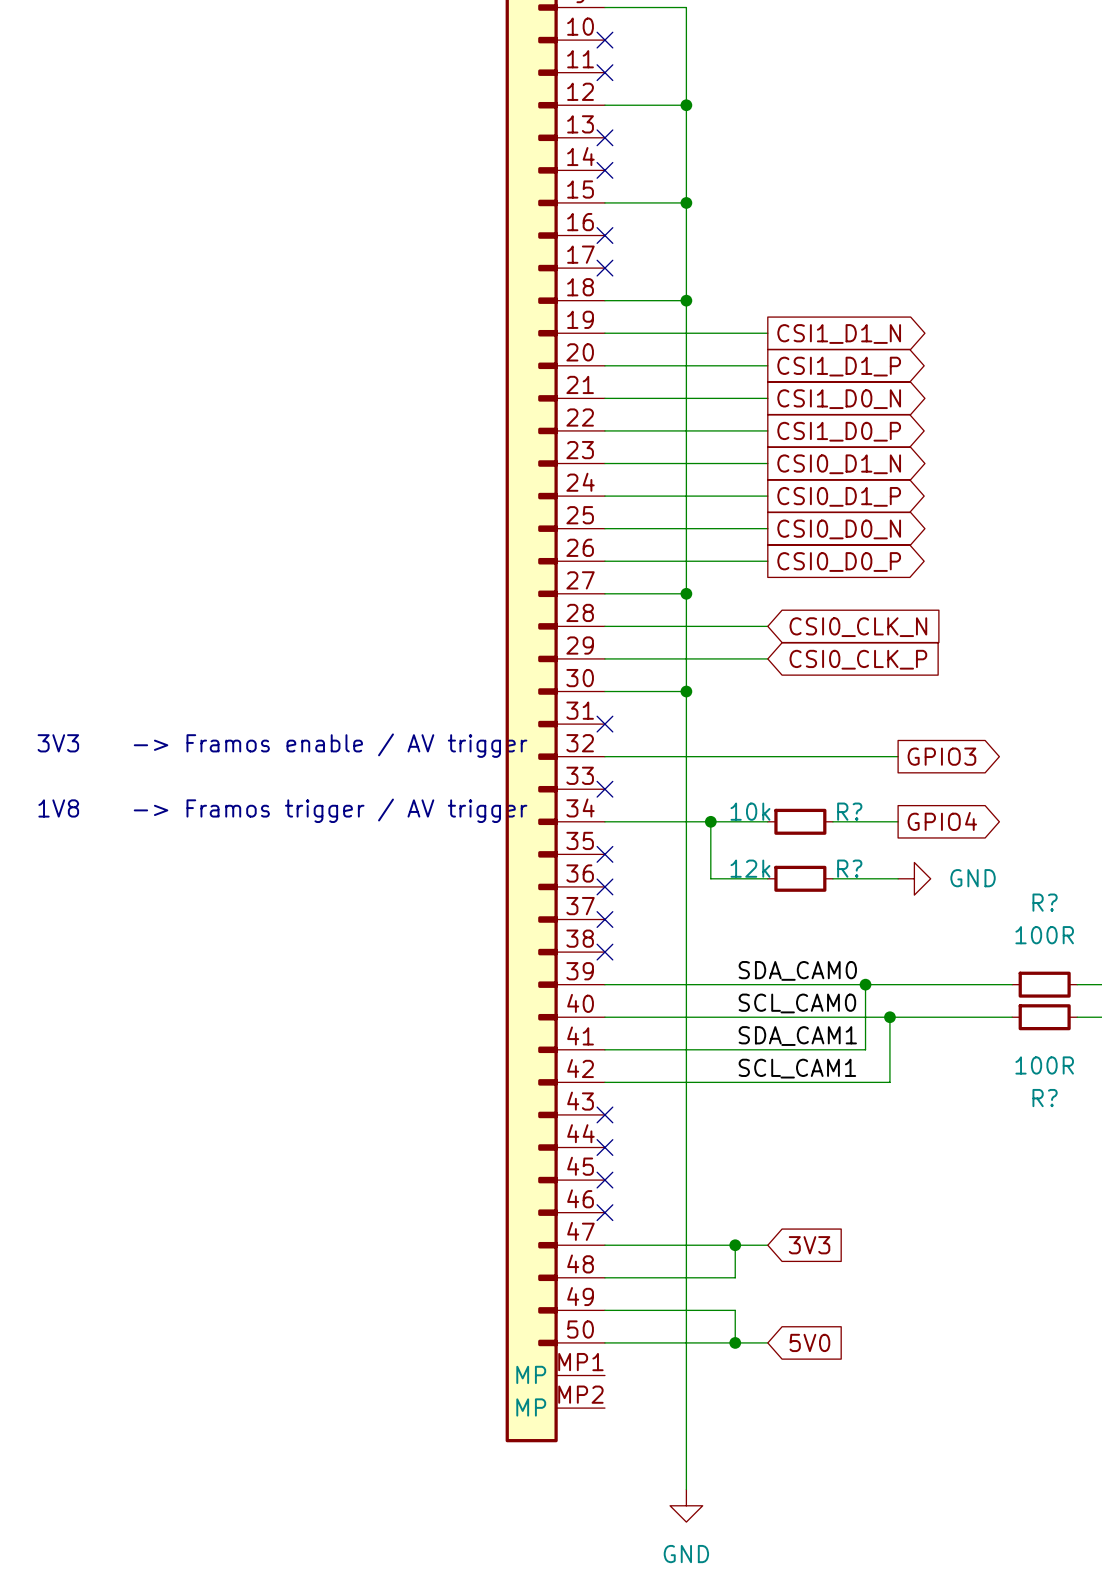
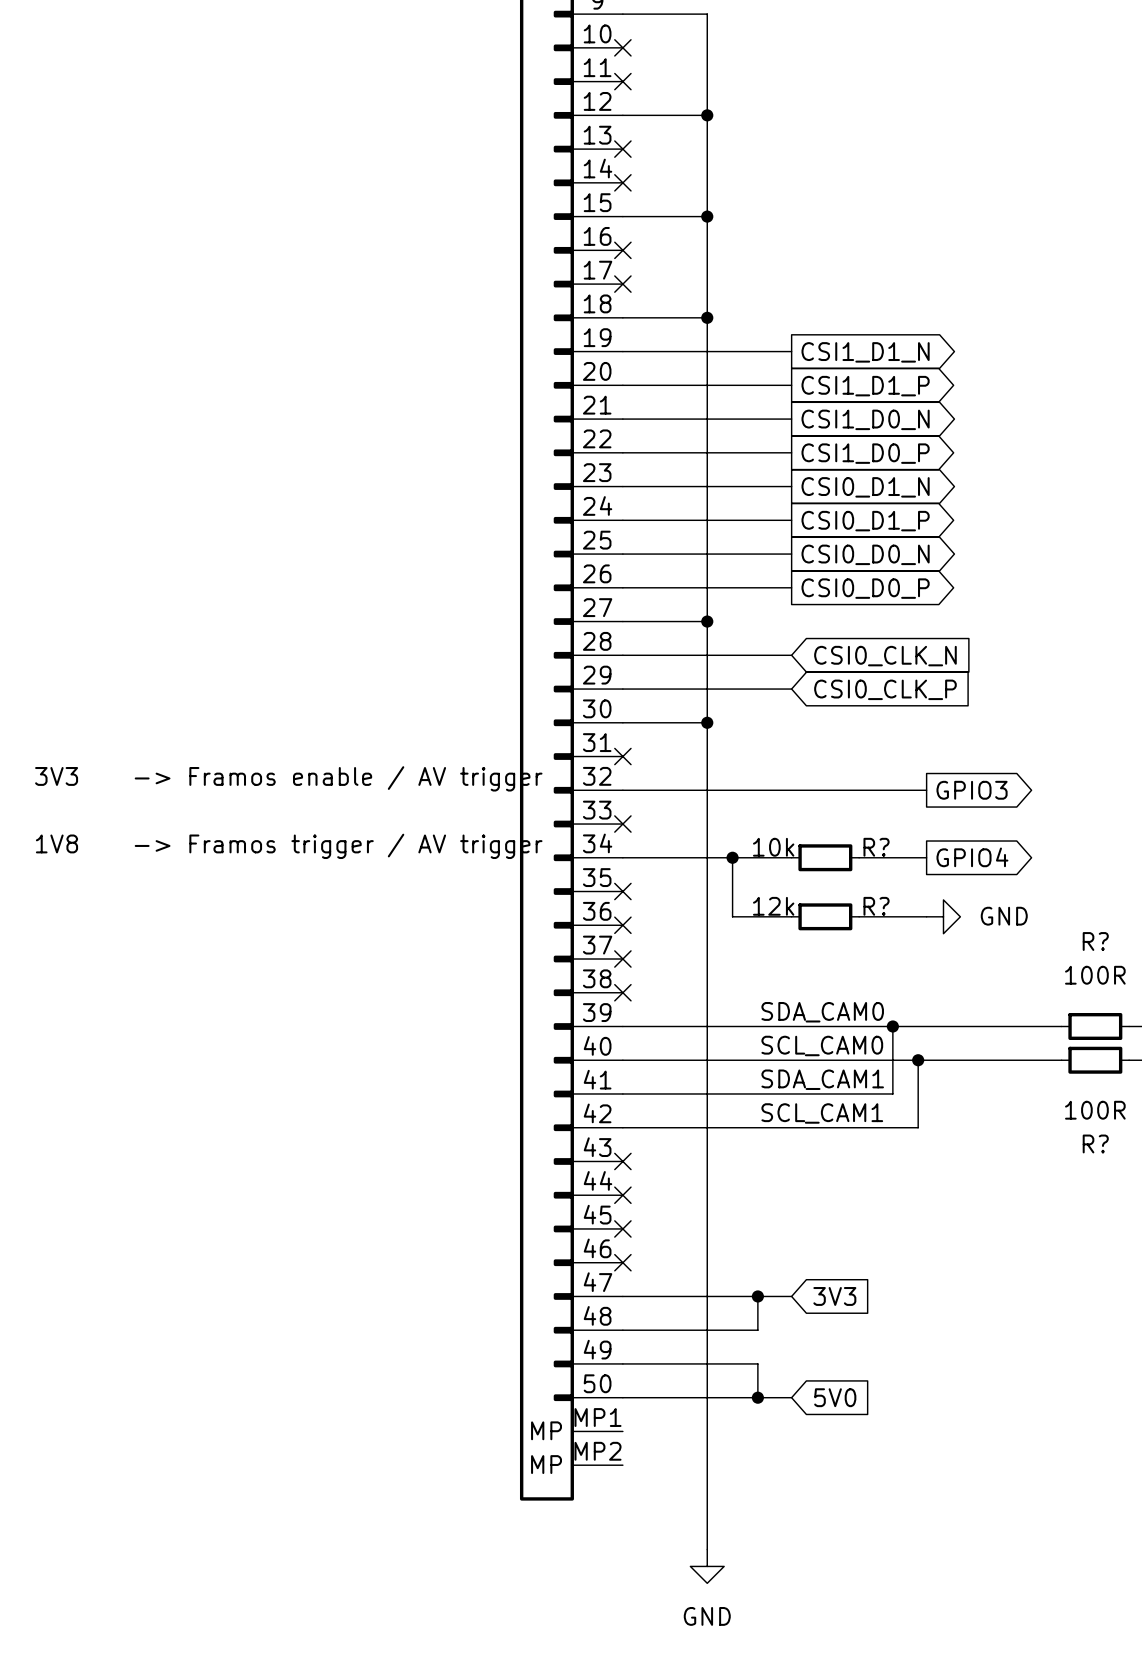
R? position: (1044, 984) -> (1095, 1026)
R? position: (1044, 1017) -> (1095, 1060)

